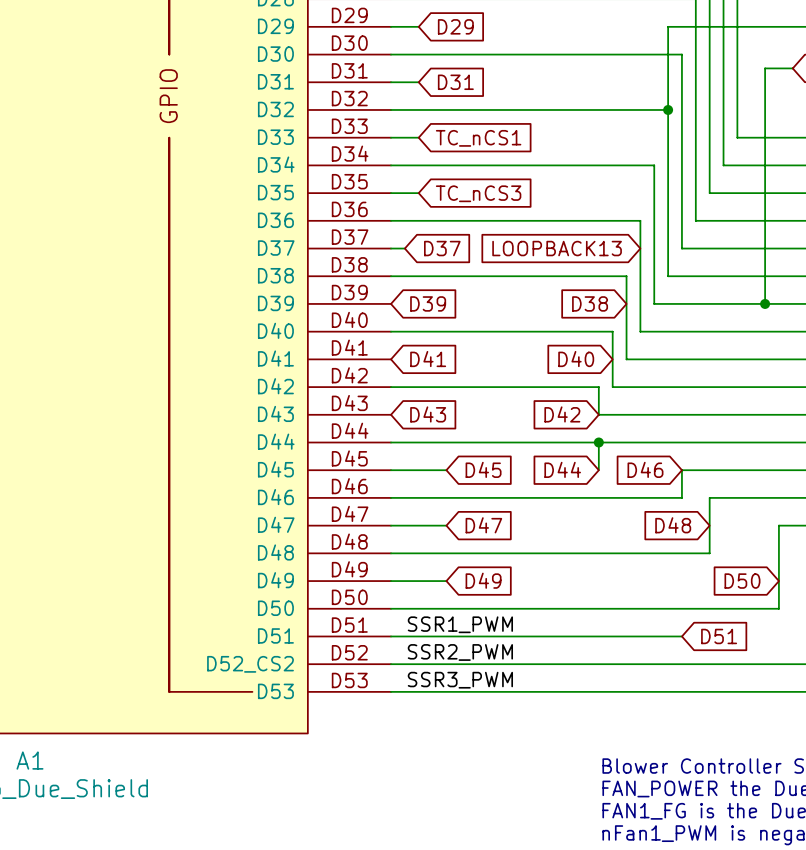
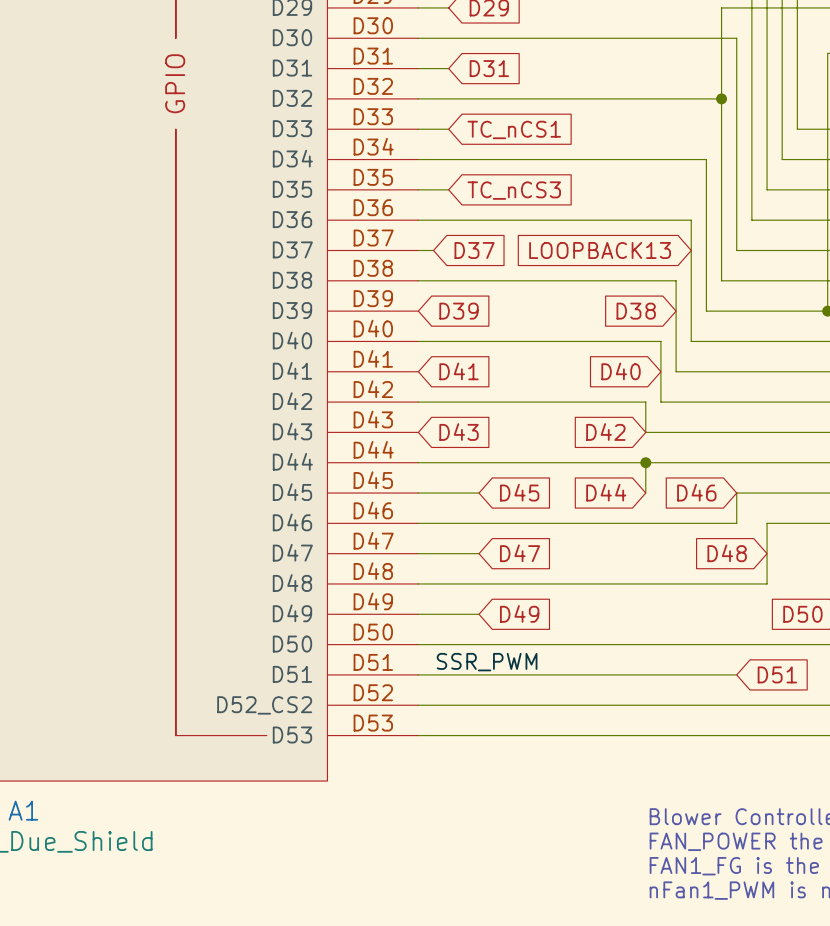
label: SSR1_PWM (460, 624) -> SSR_PWM (487, 662)
label: SSR2_PWM (460, 652) -> none
label: SSR3_PWM (460, 680) -> none

